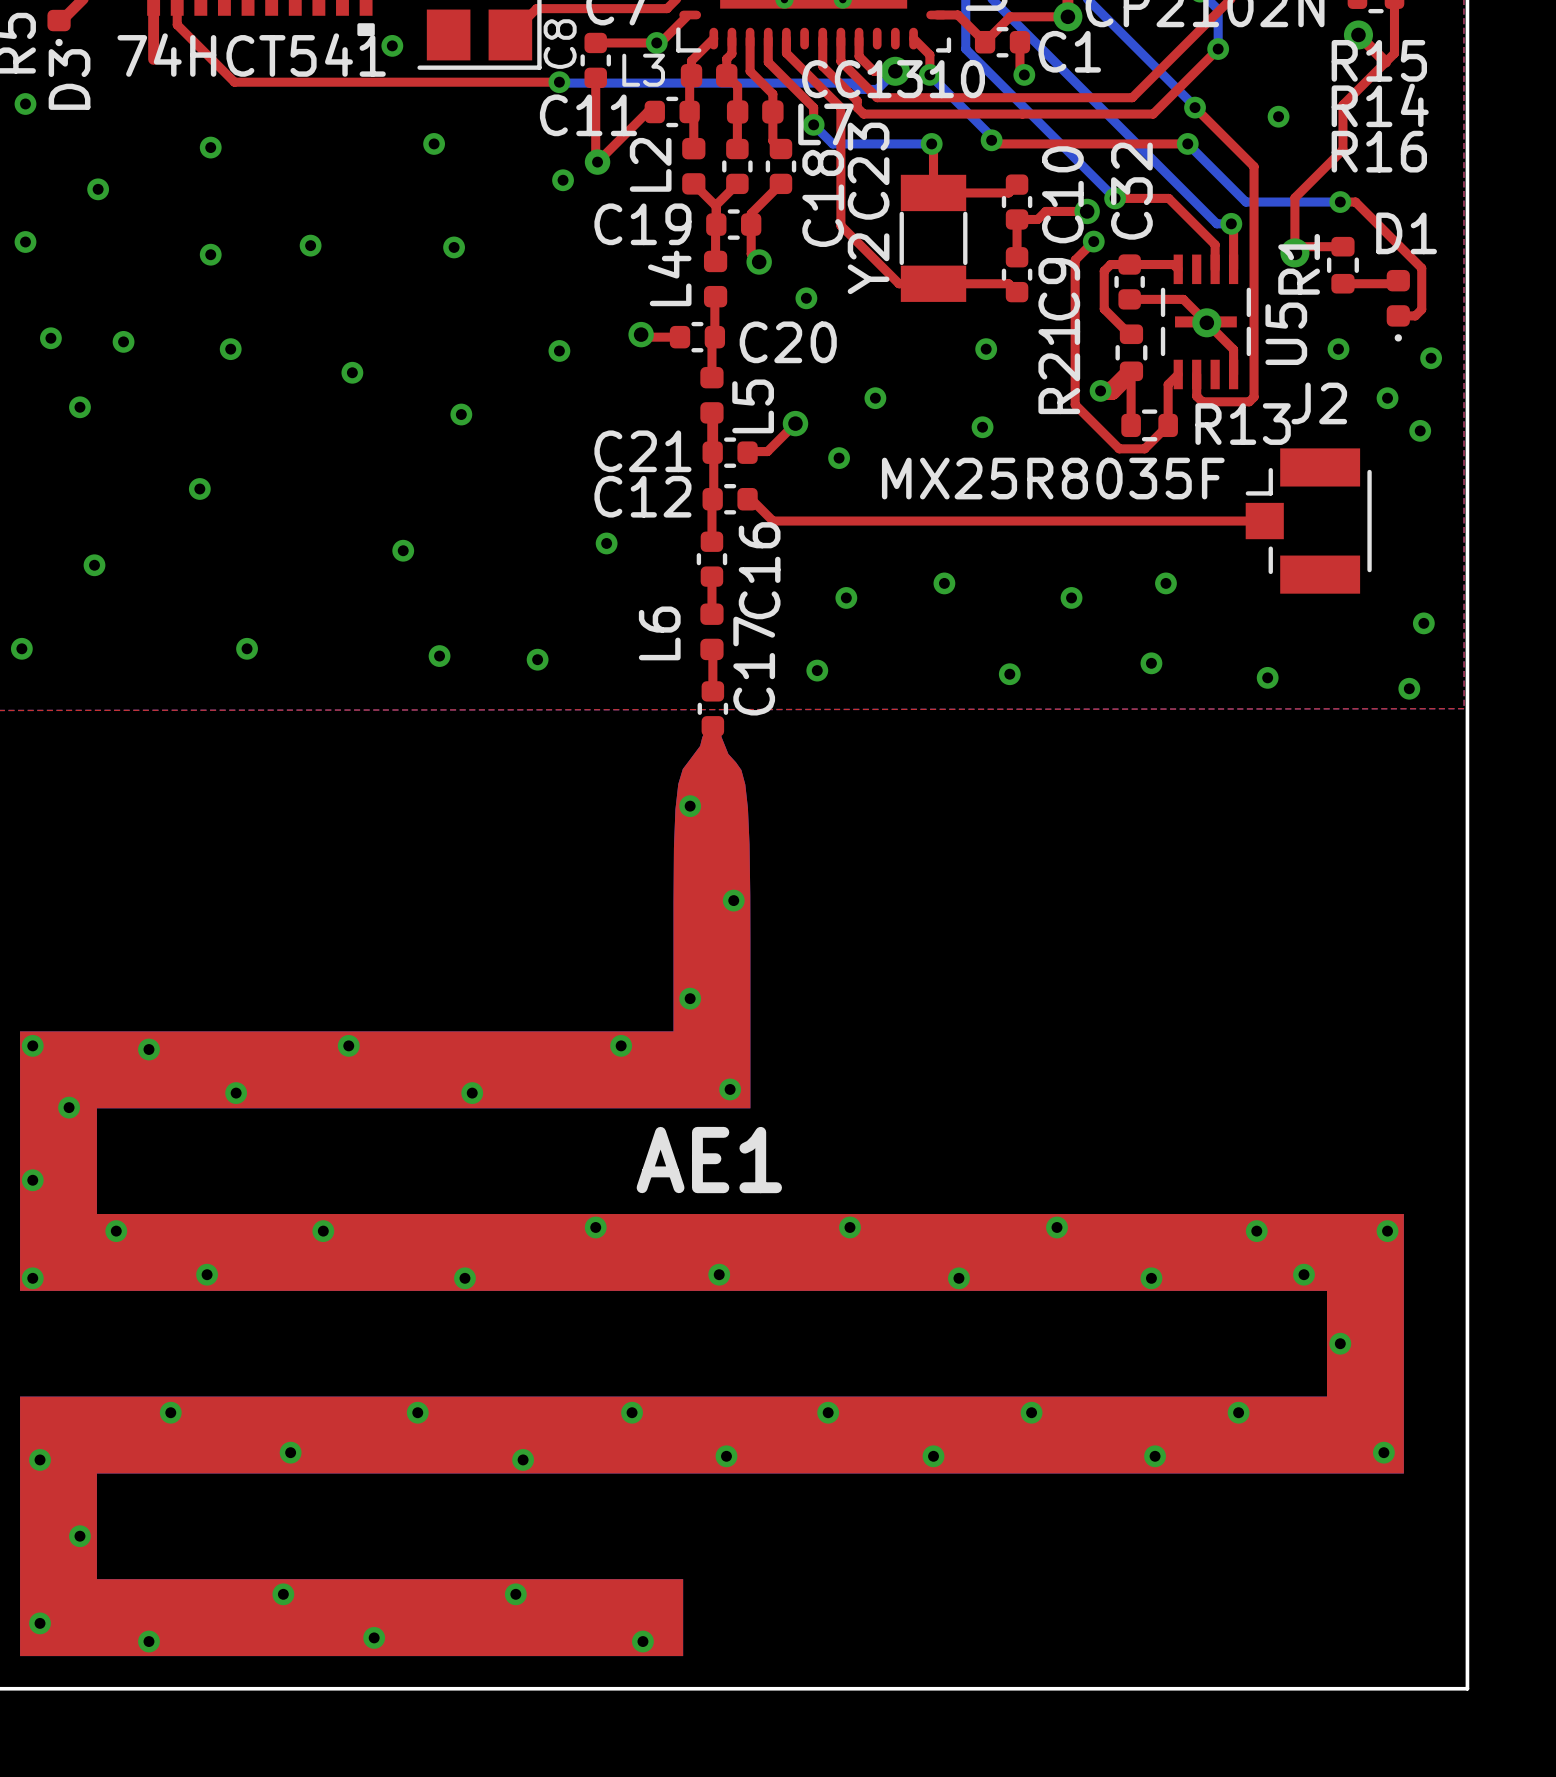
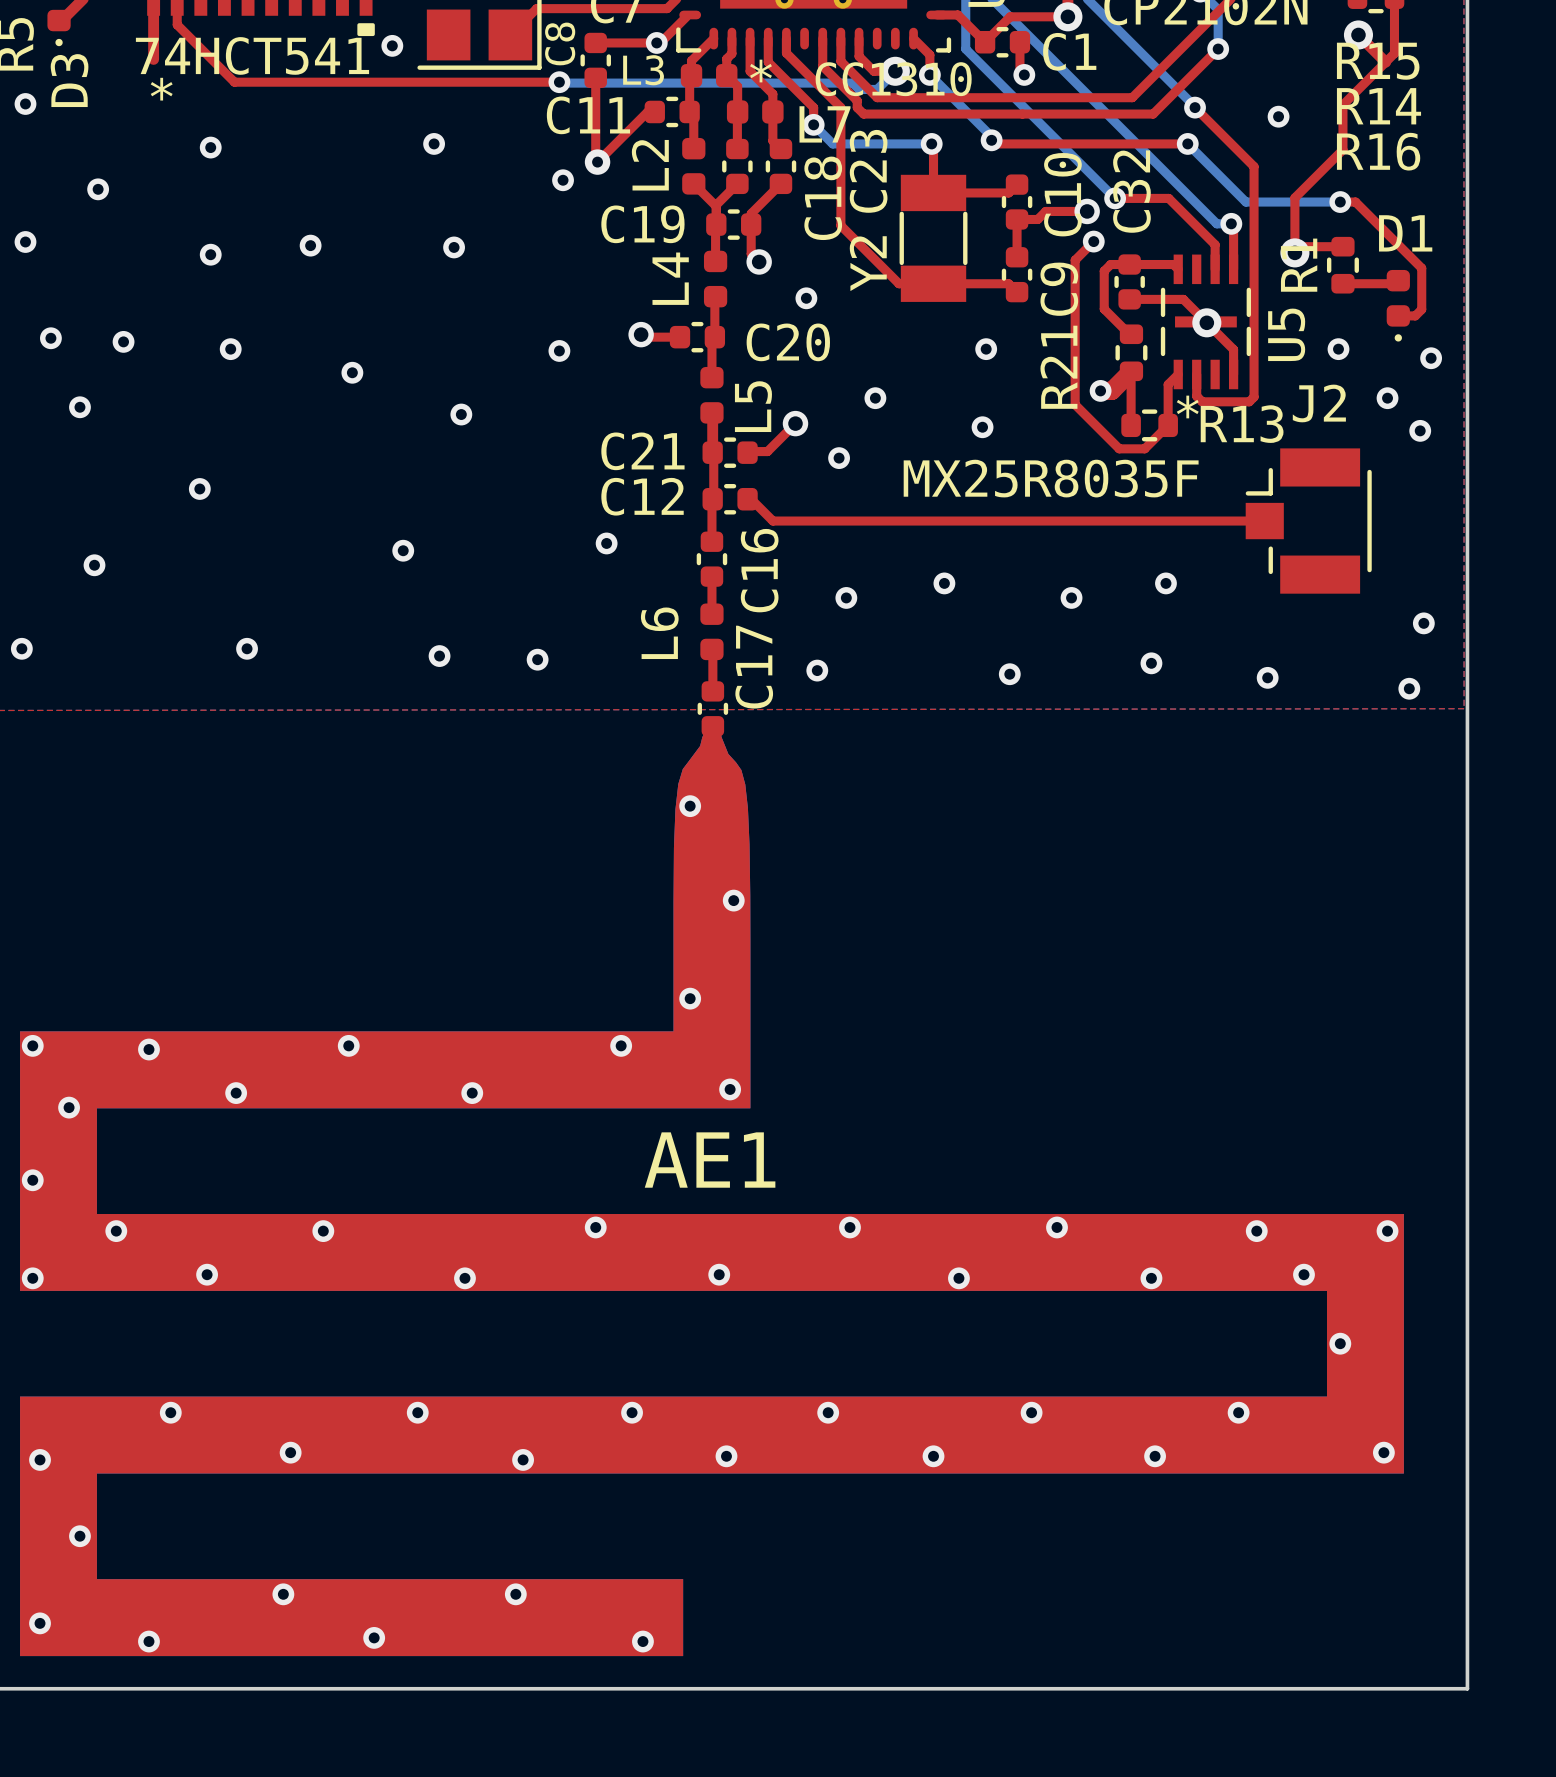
text: none -> * (760, 71)
text: none -> * (161, 89)
text: none -> * (1187, 406)

